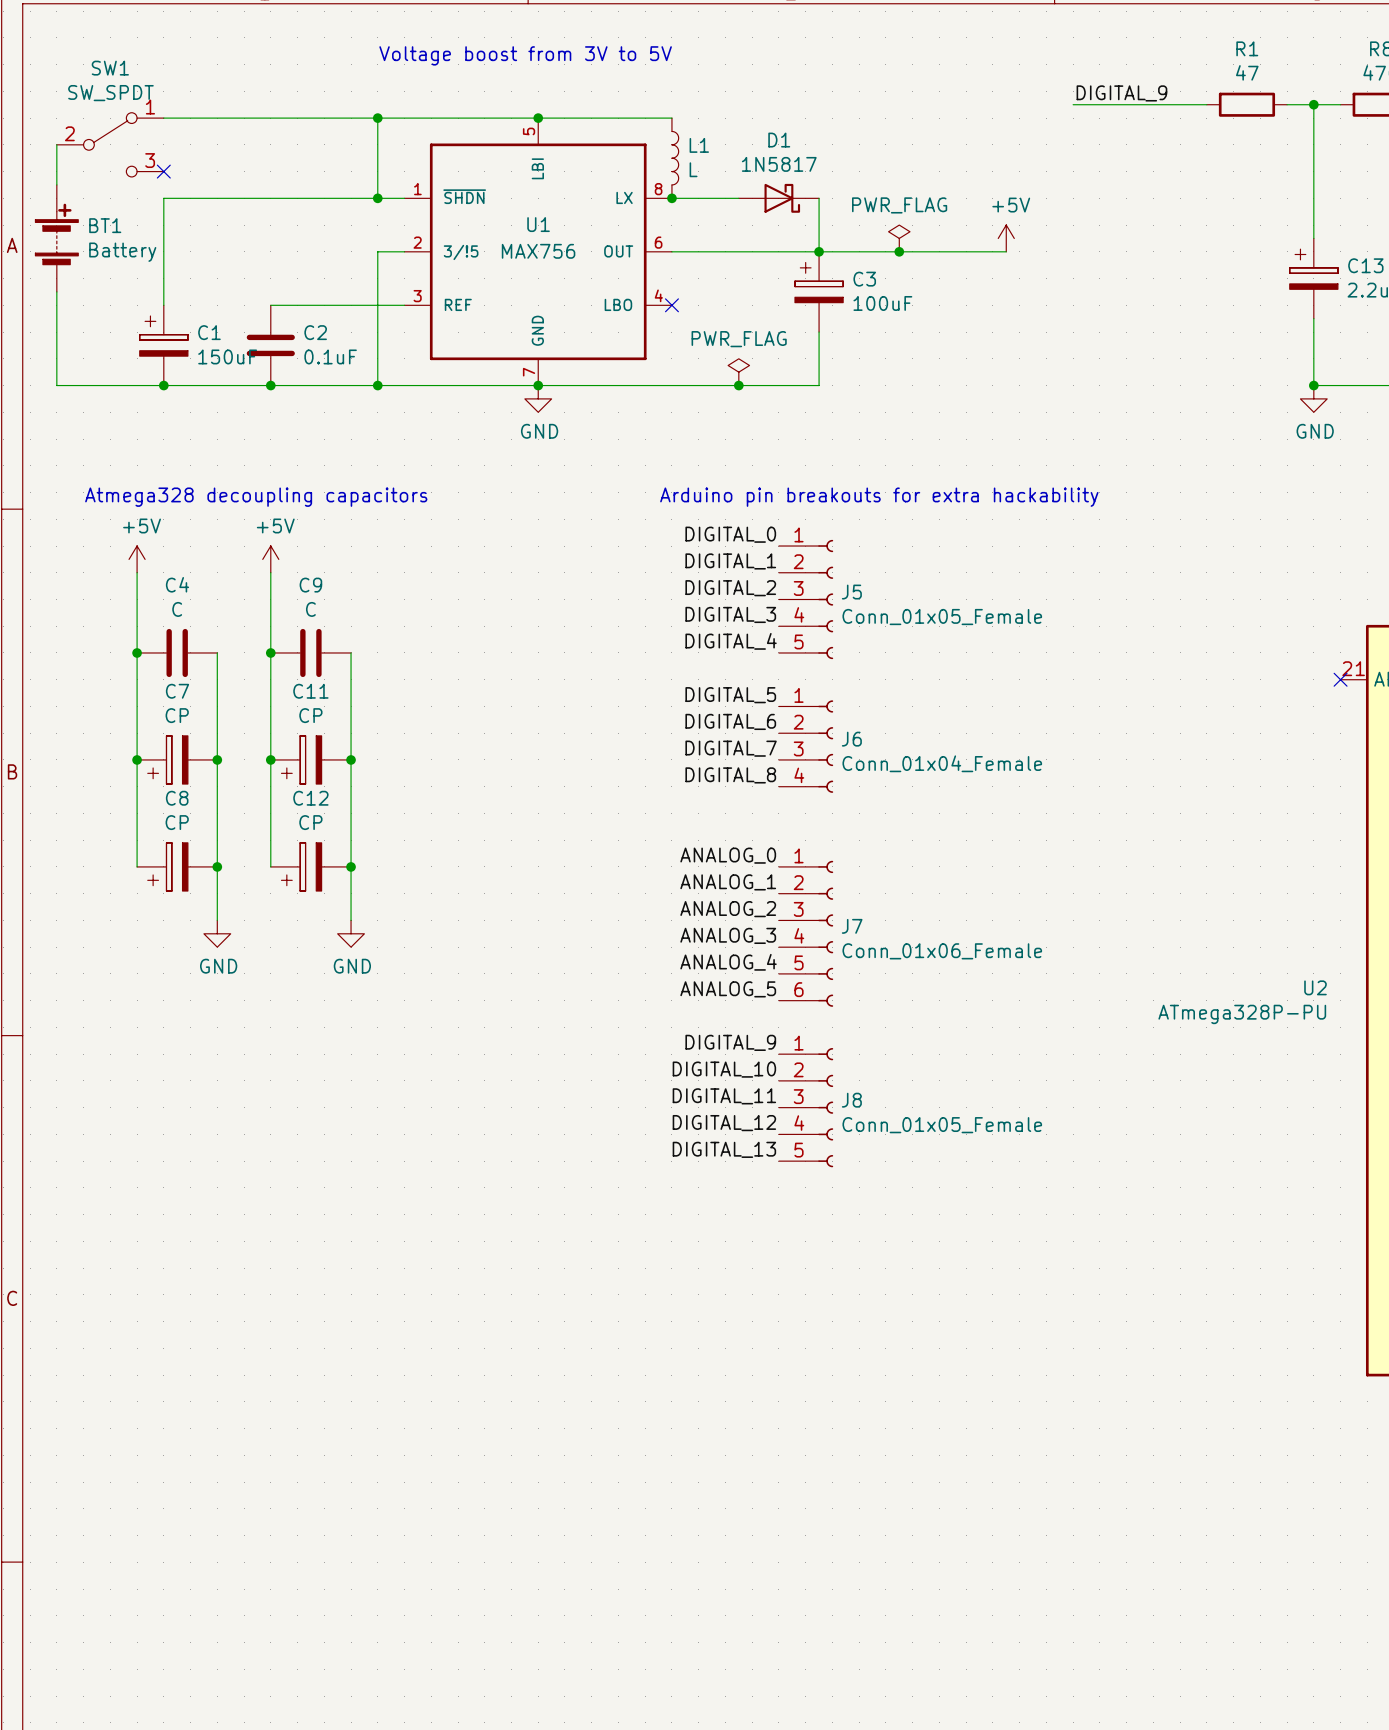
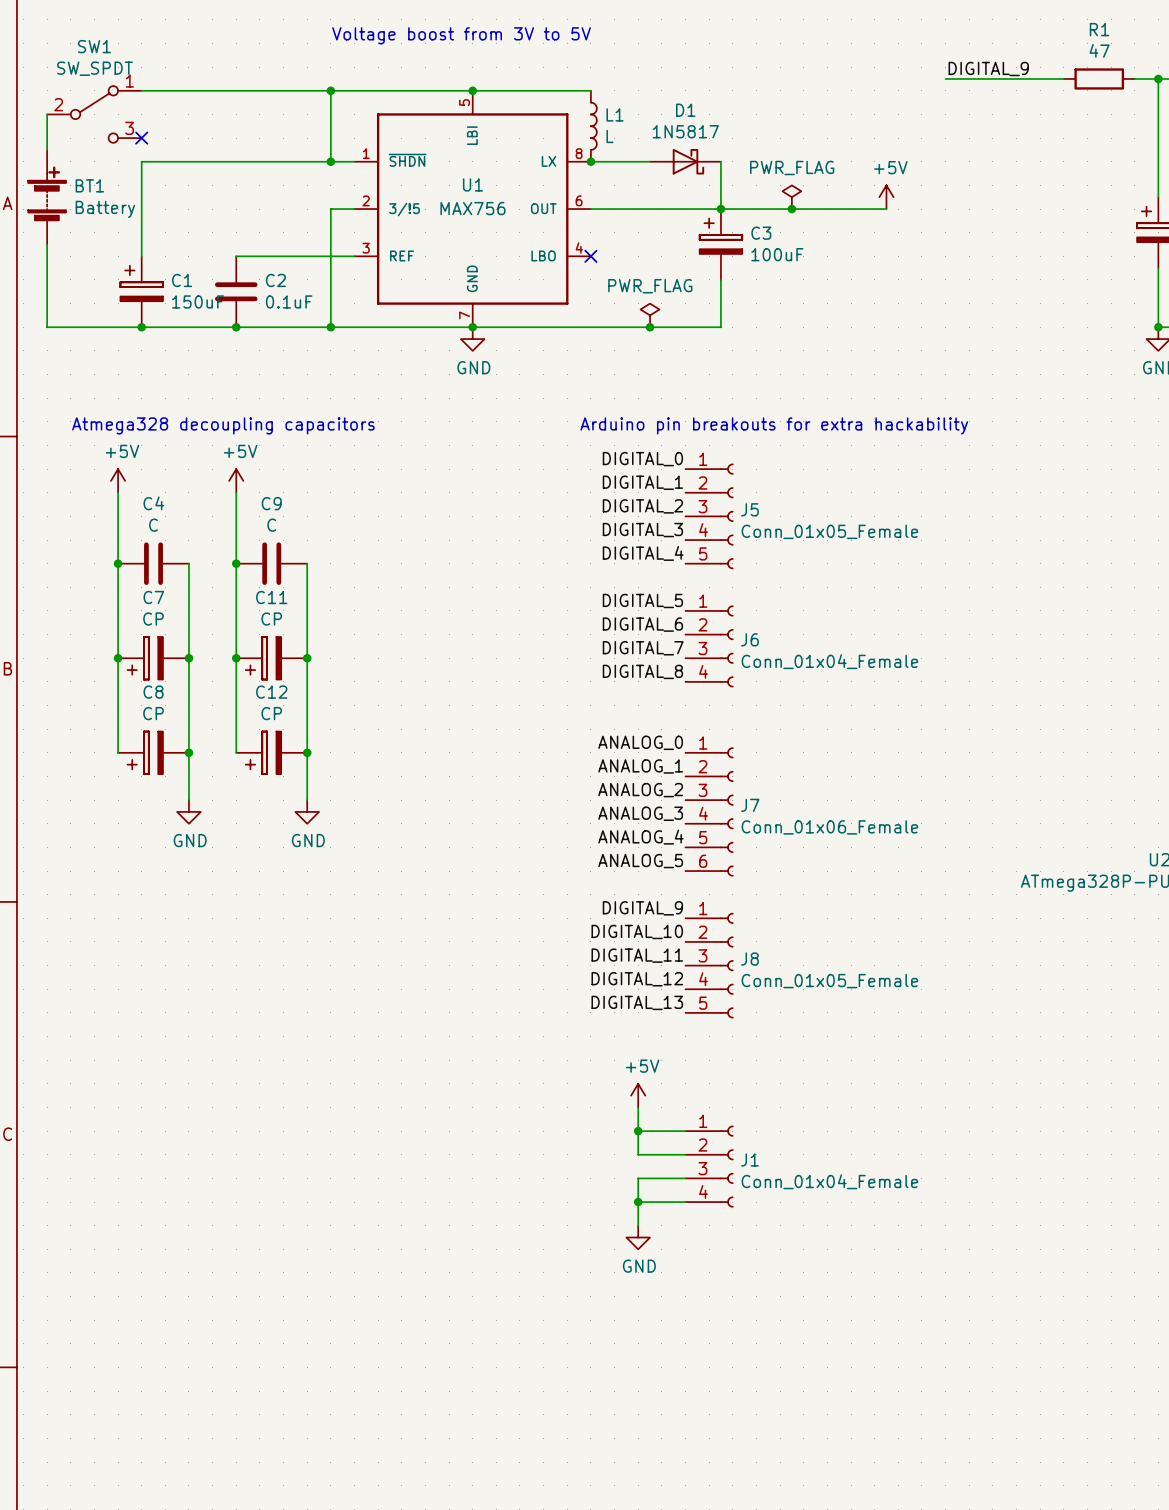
power symbol: none -> +5V (638, 1095)
wire: none -> (638, 1107) (638, 1154) (685, 1154)
wire: none -> (638, 1131) (685, 1131)
junction: none -> (638, 1131)
J1: none -> Conn_01x04_Female (709, 1166)
wire: none -> (685, 1178) (638, 1178) (638, 1225)
wire: none -> (638, 1202) (685, 1202)
junction: none -> (638, 1202)
power symbol: none -> GND (638, 1237)

